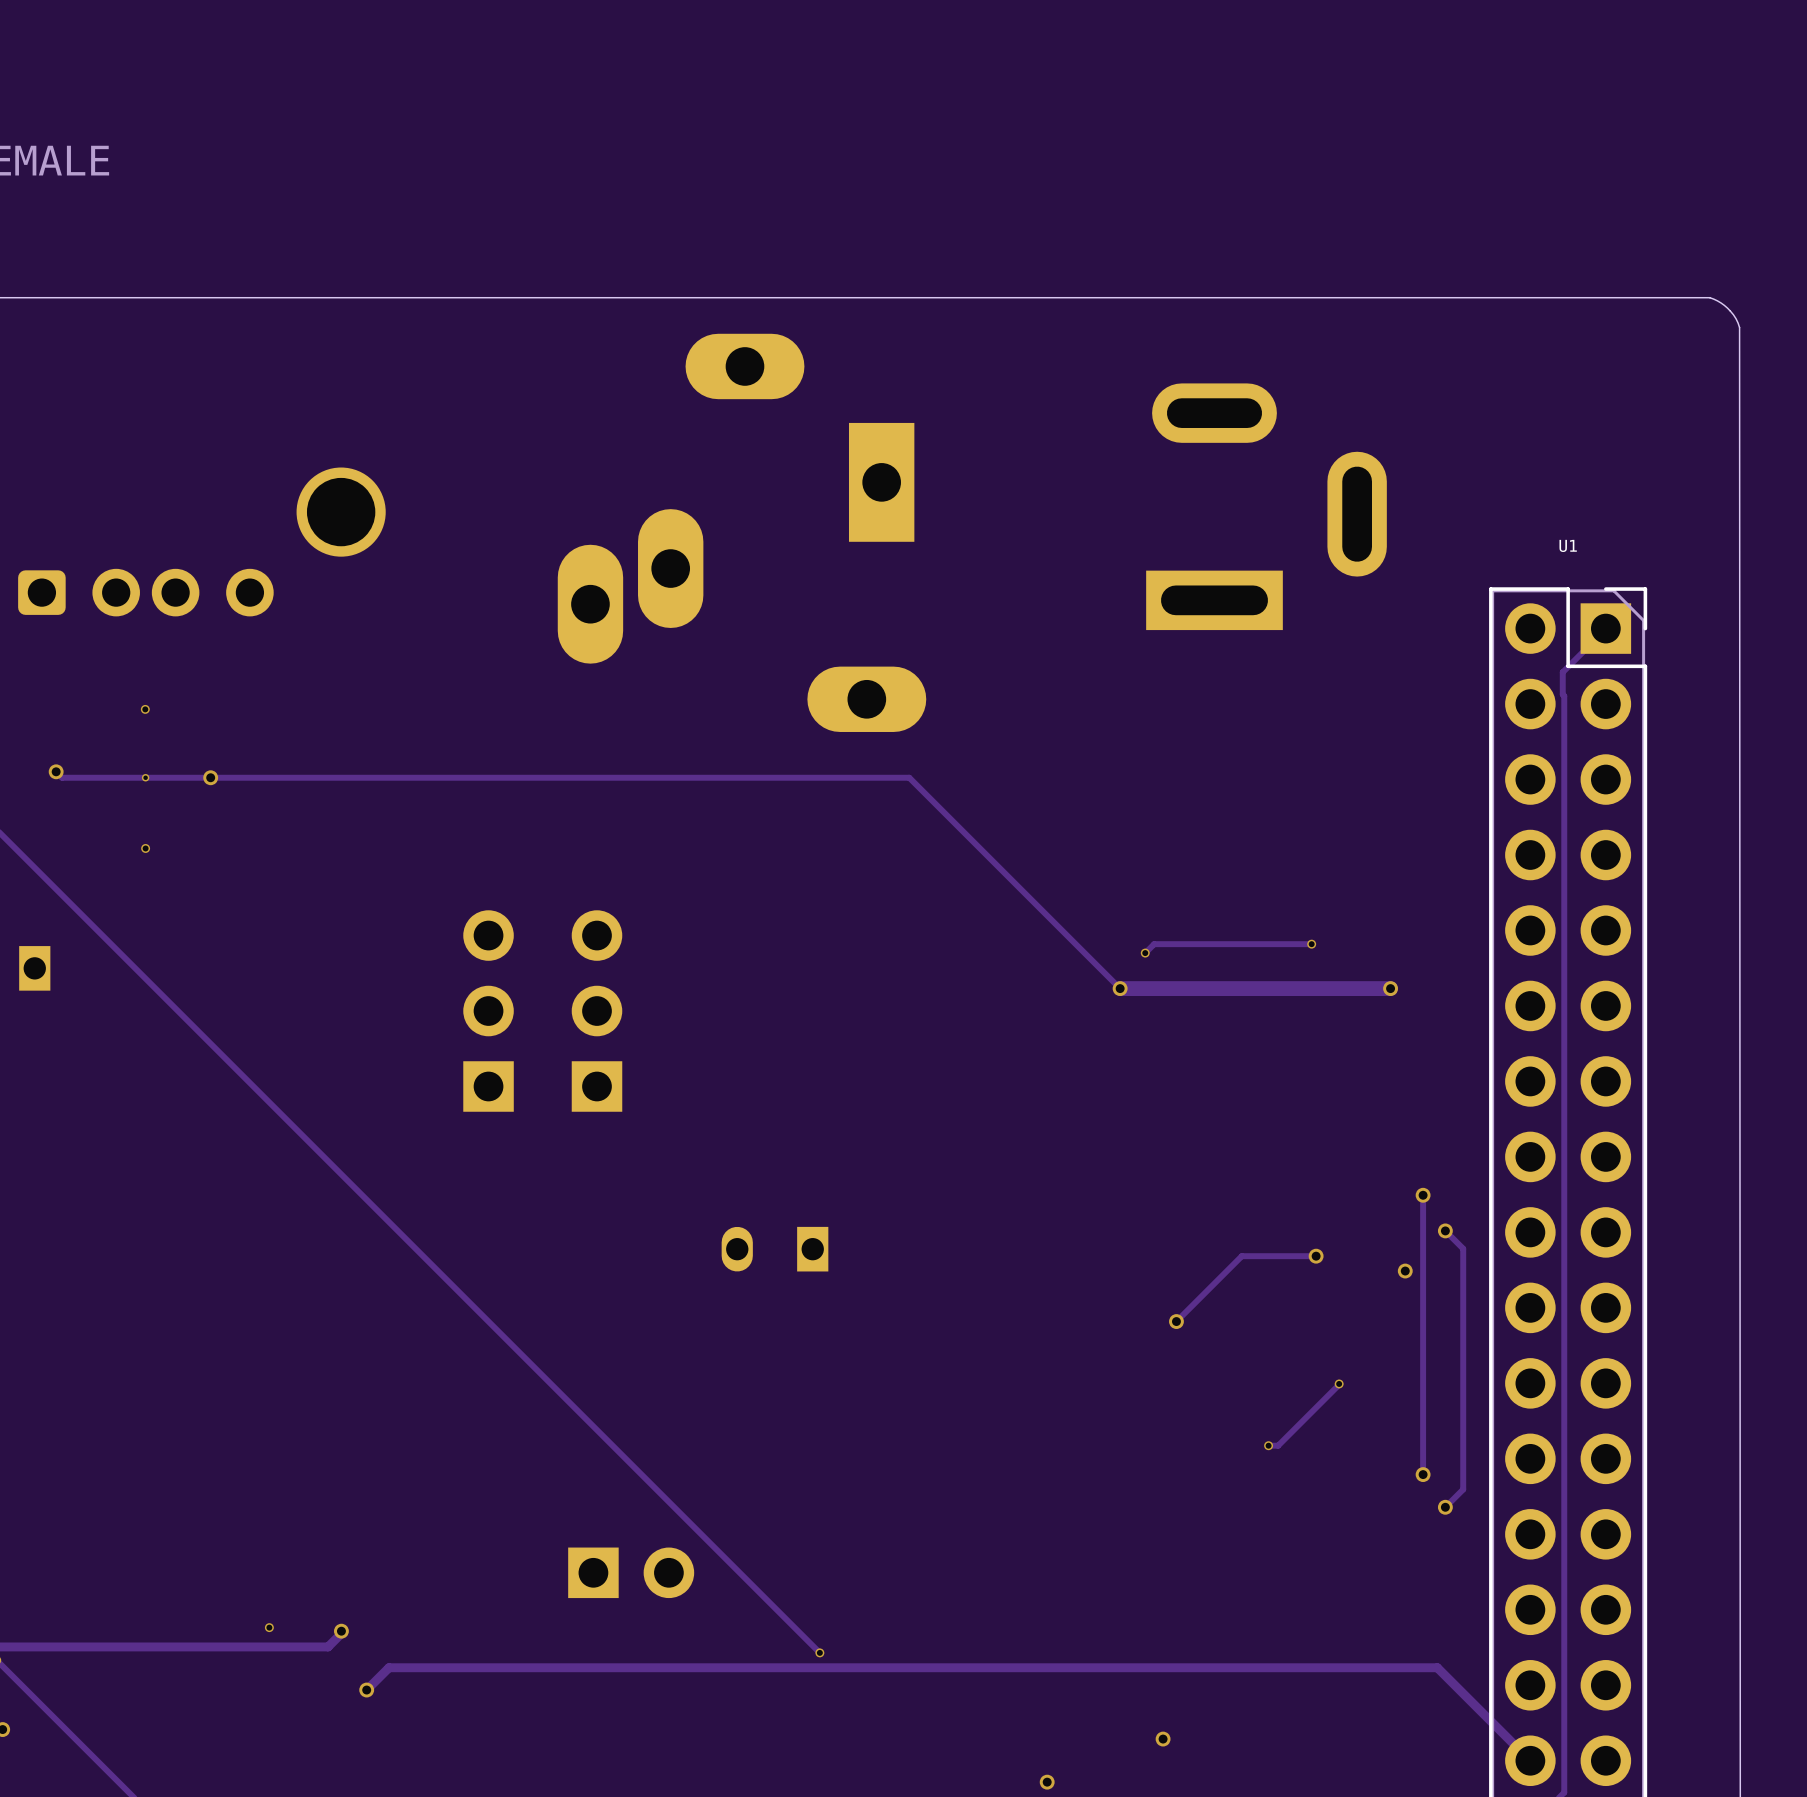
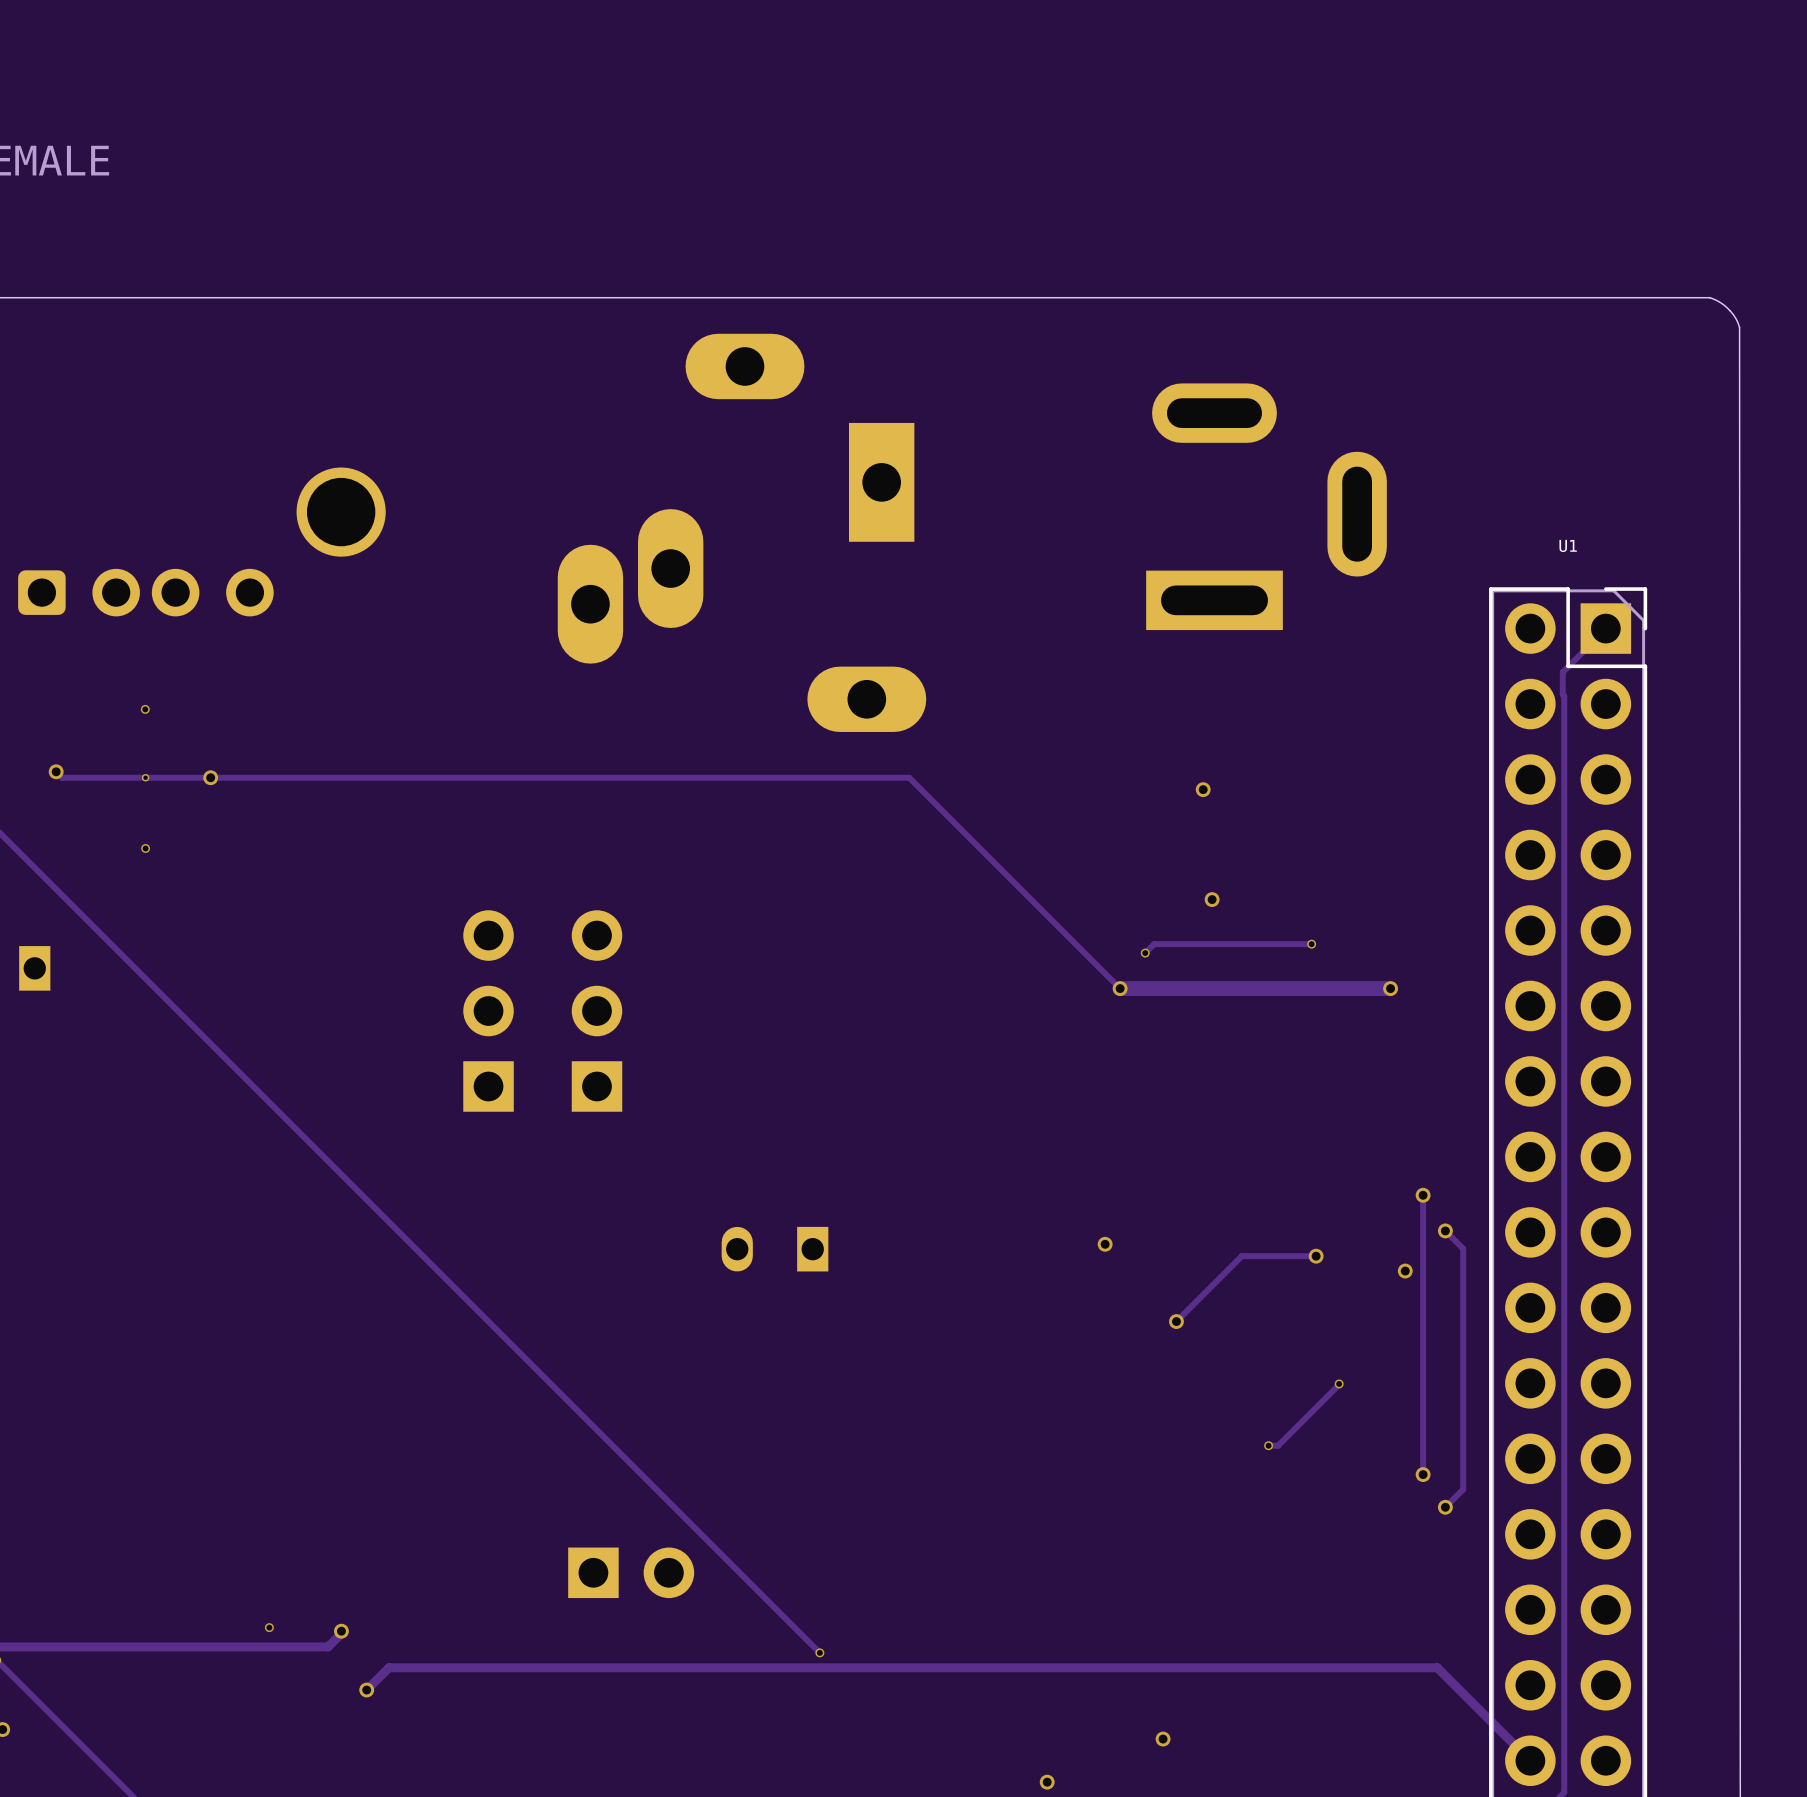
via: none -> (1203, 789)
via: none -> (1212, 899)
via: none -> (1105, 1244)

